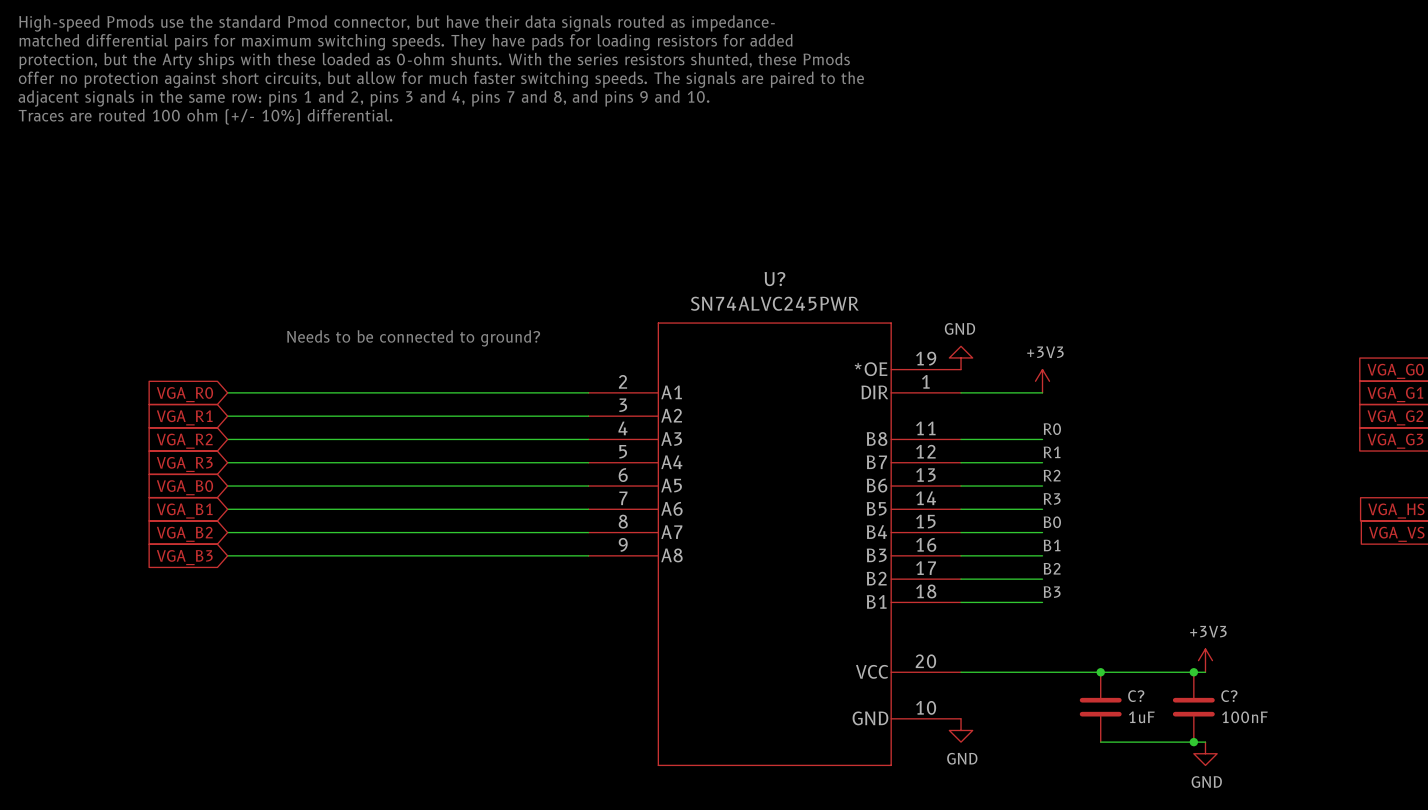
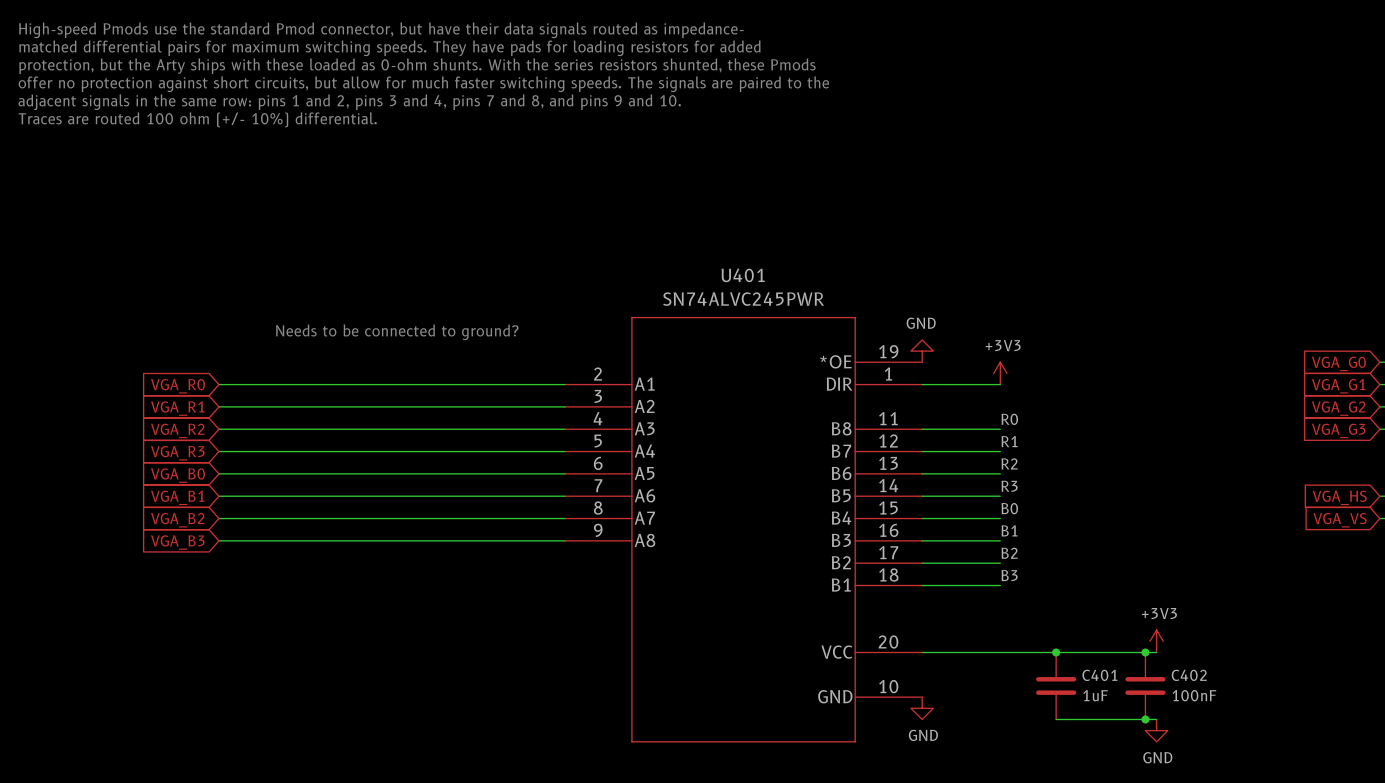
U? name: U? (774, 279) -> U401 (743, 275)
C? name: C? (1136, 696) -> C401 (1099, 675)
C? name: C? (1229, 696) -> C402 (1189, 675)

